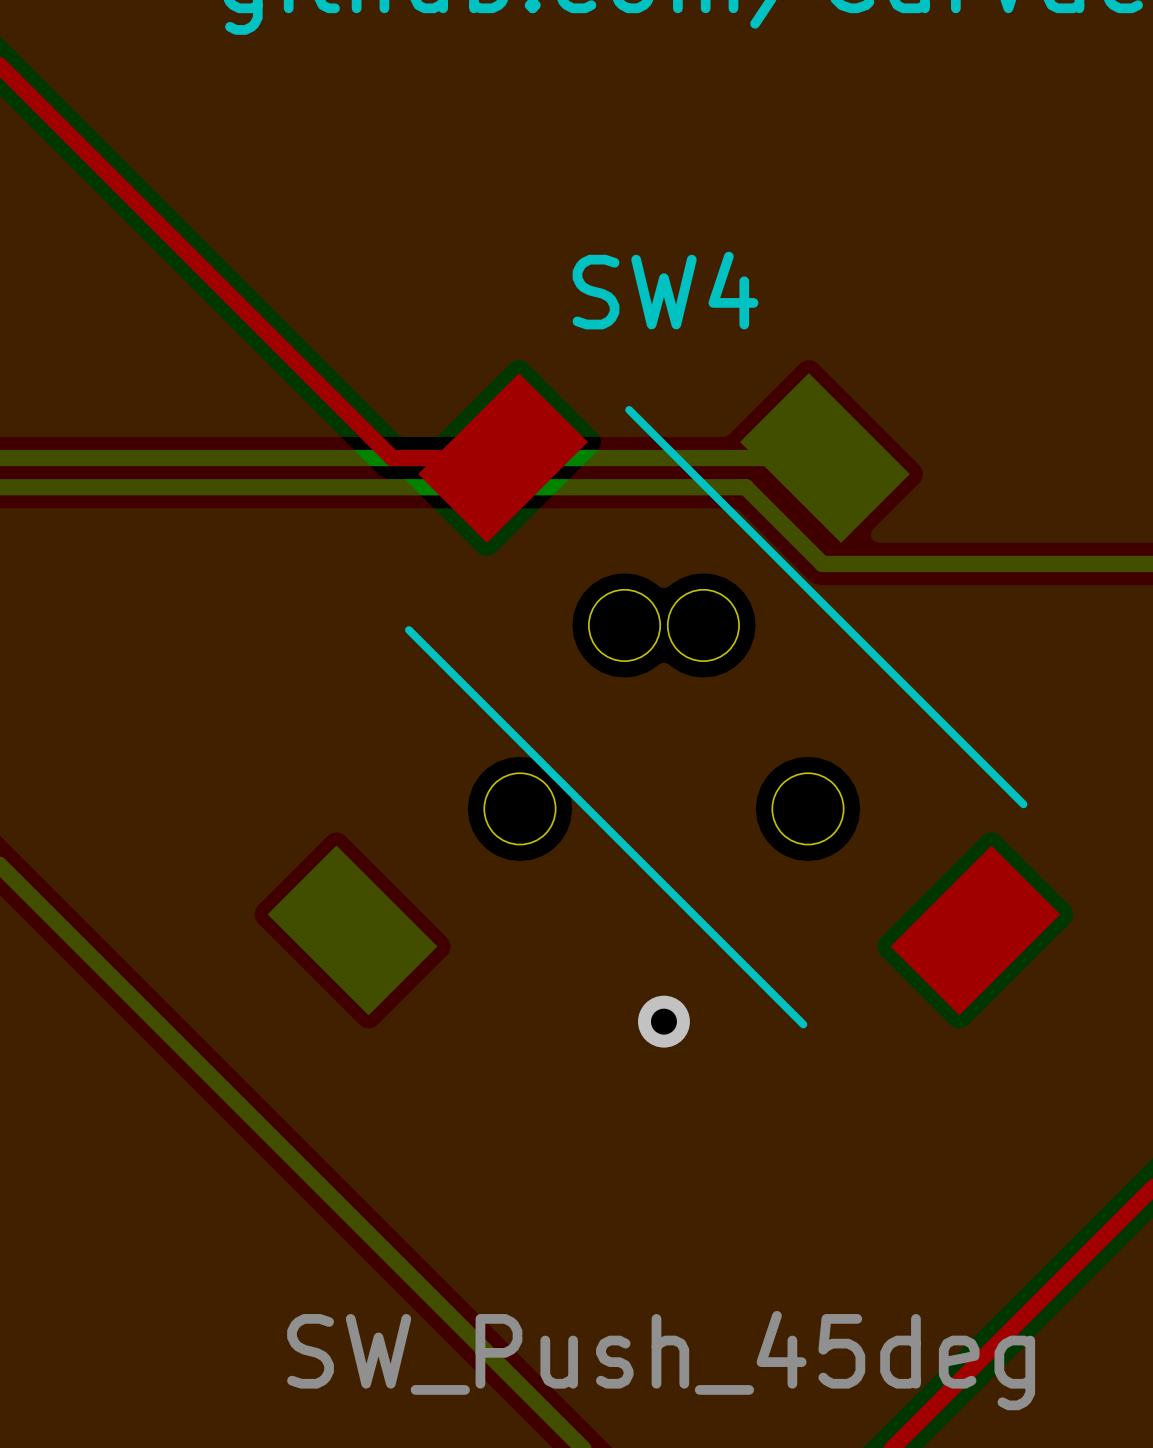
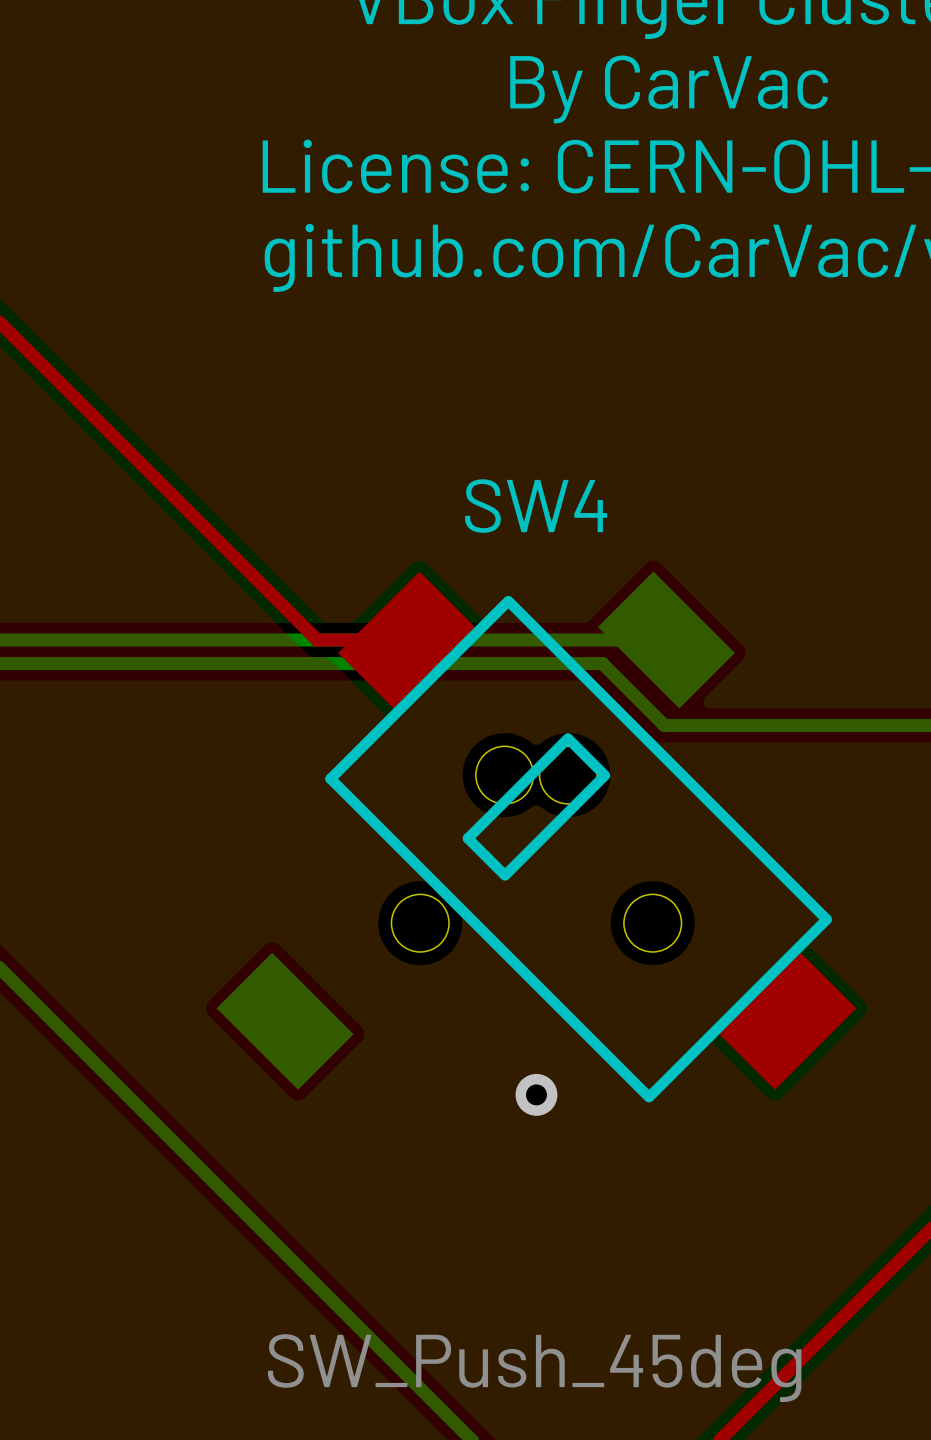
SW4 footprint: [405, 373, 1061, 1029] -> [325, 571, 857, 1103]

